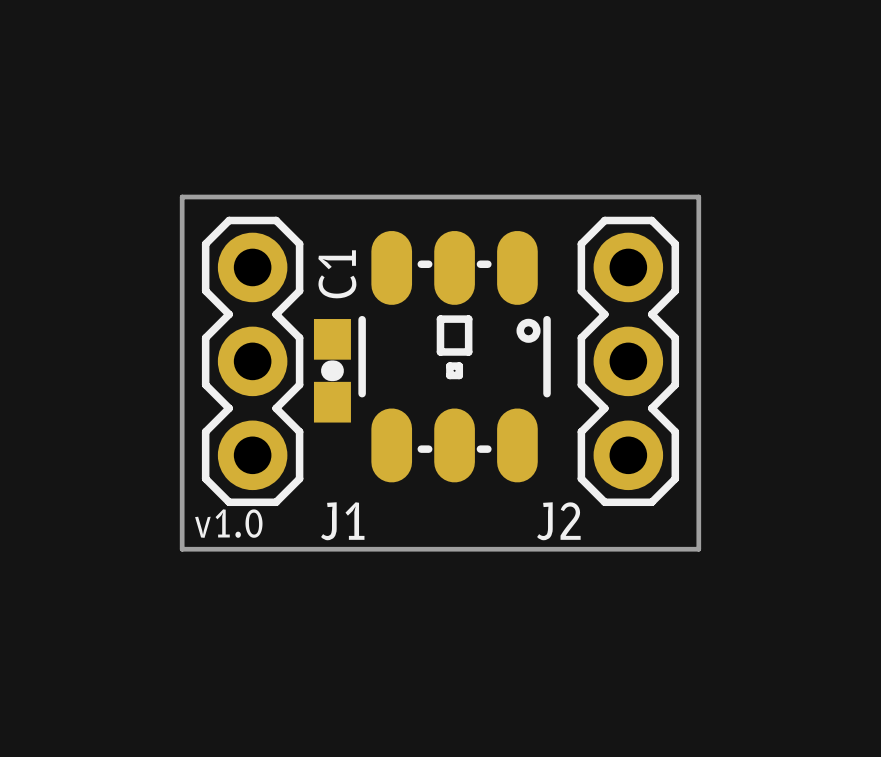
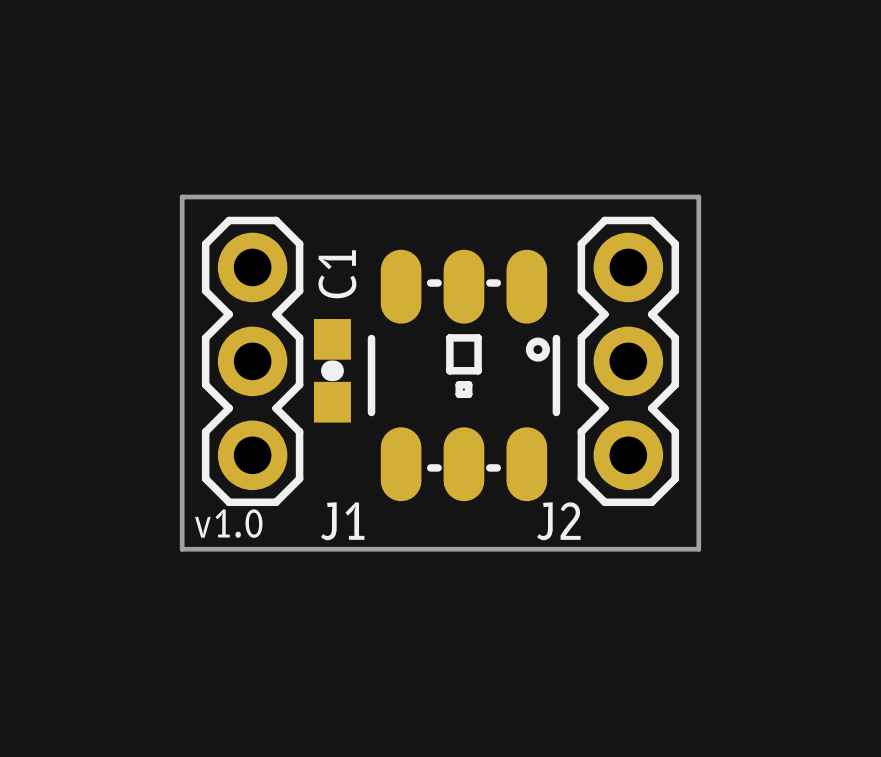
part position: (454, 356) -> (463, 375)

